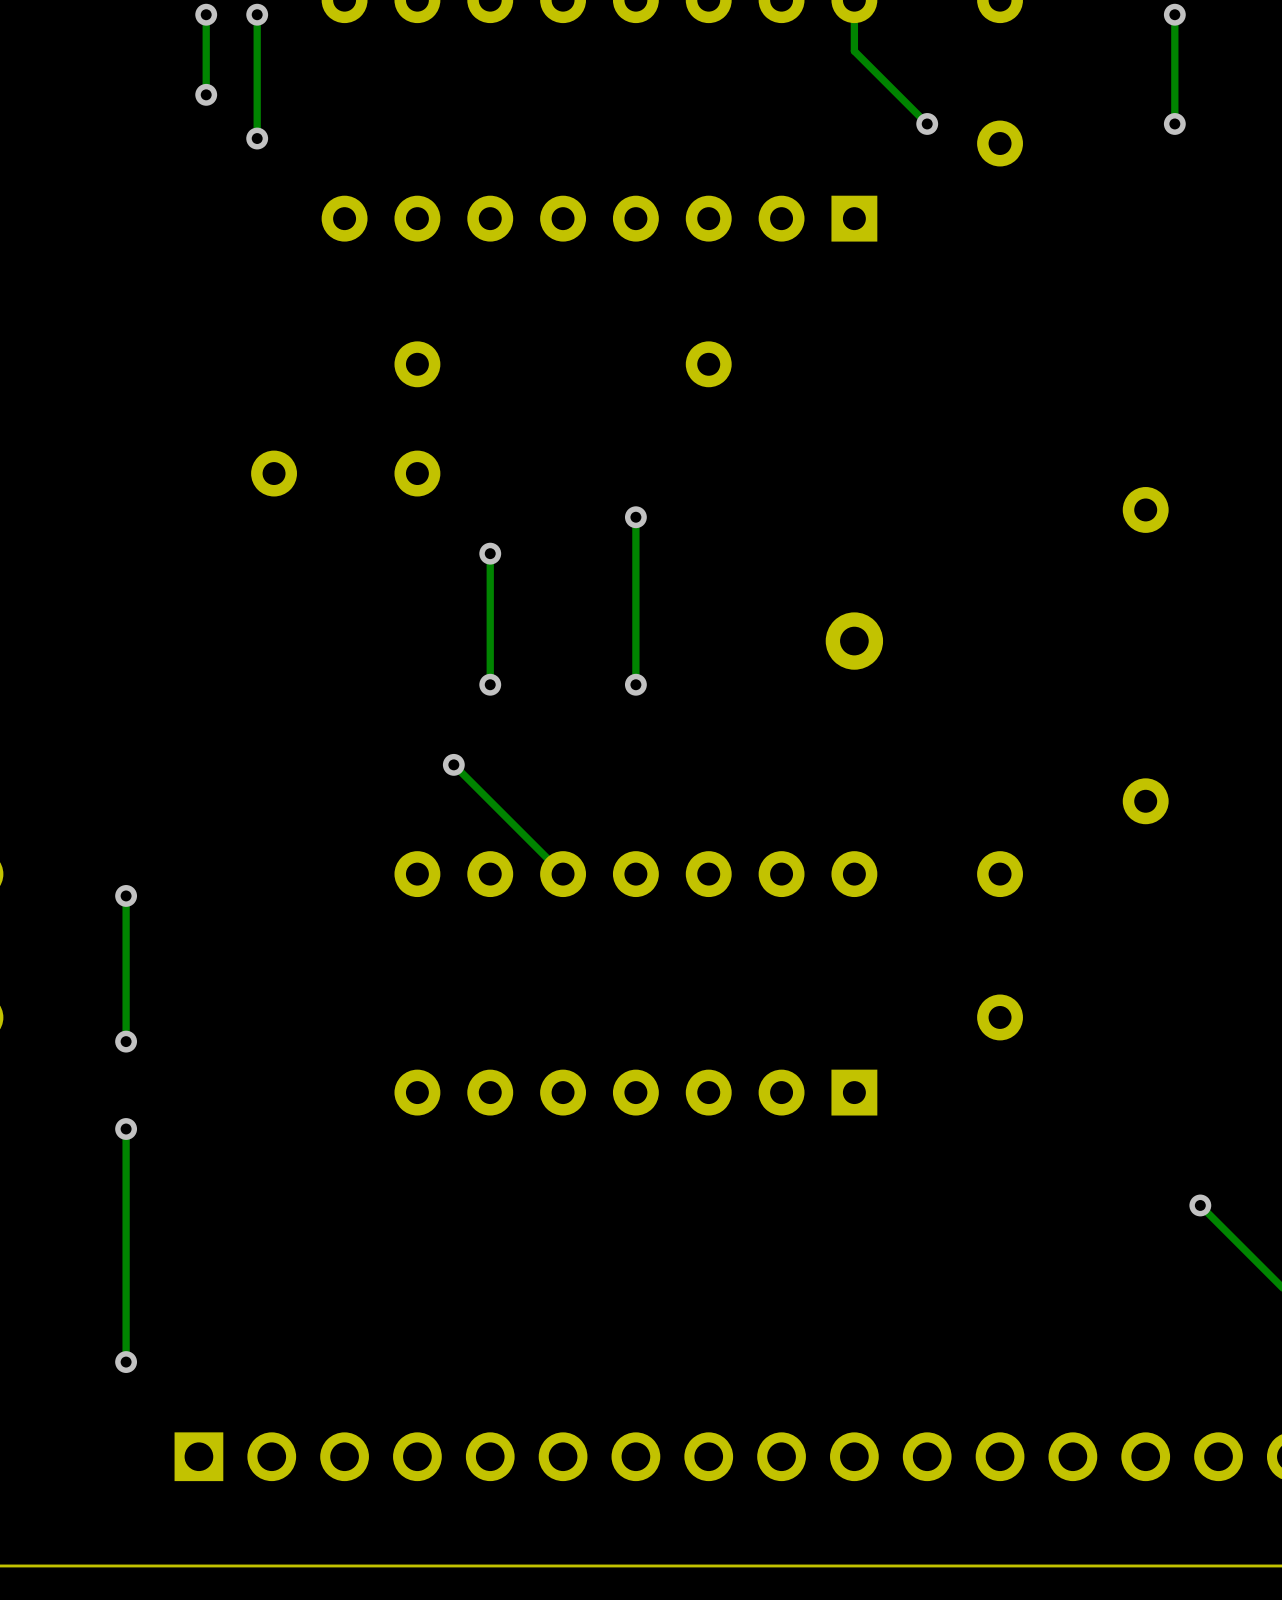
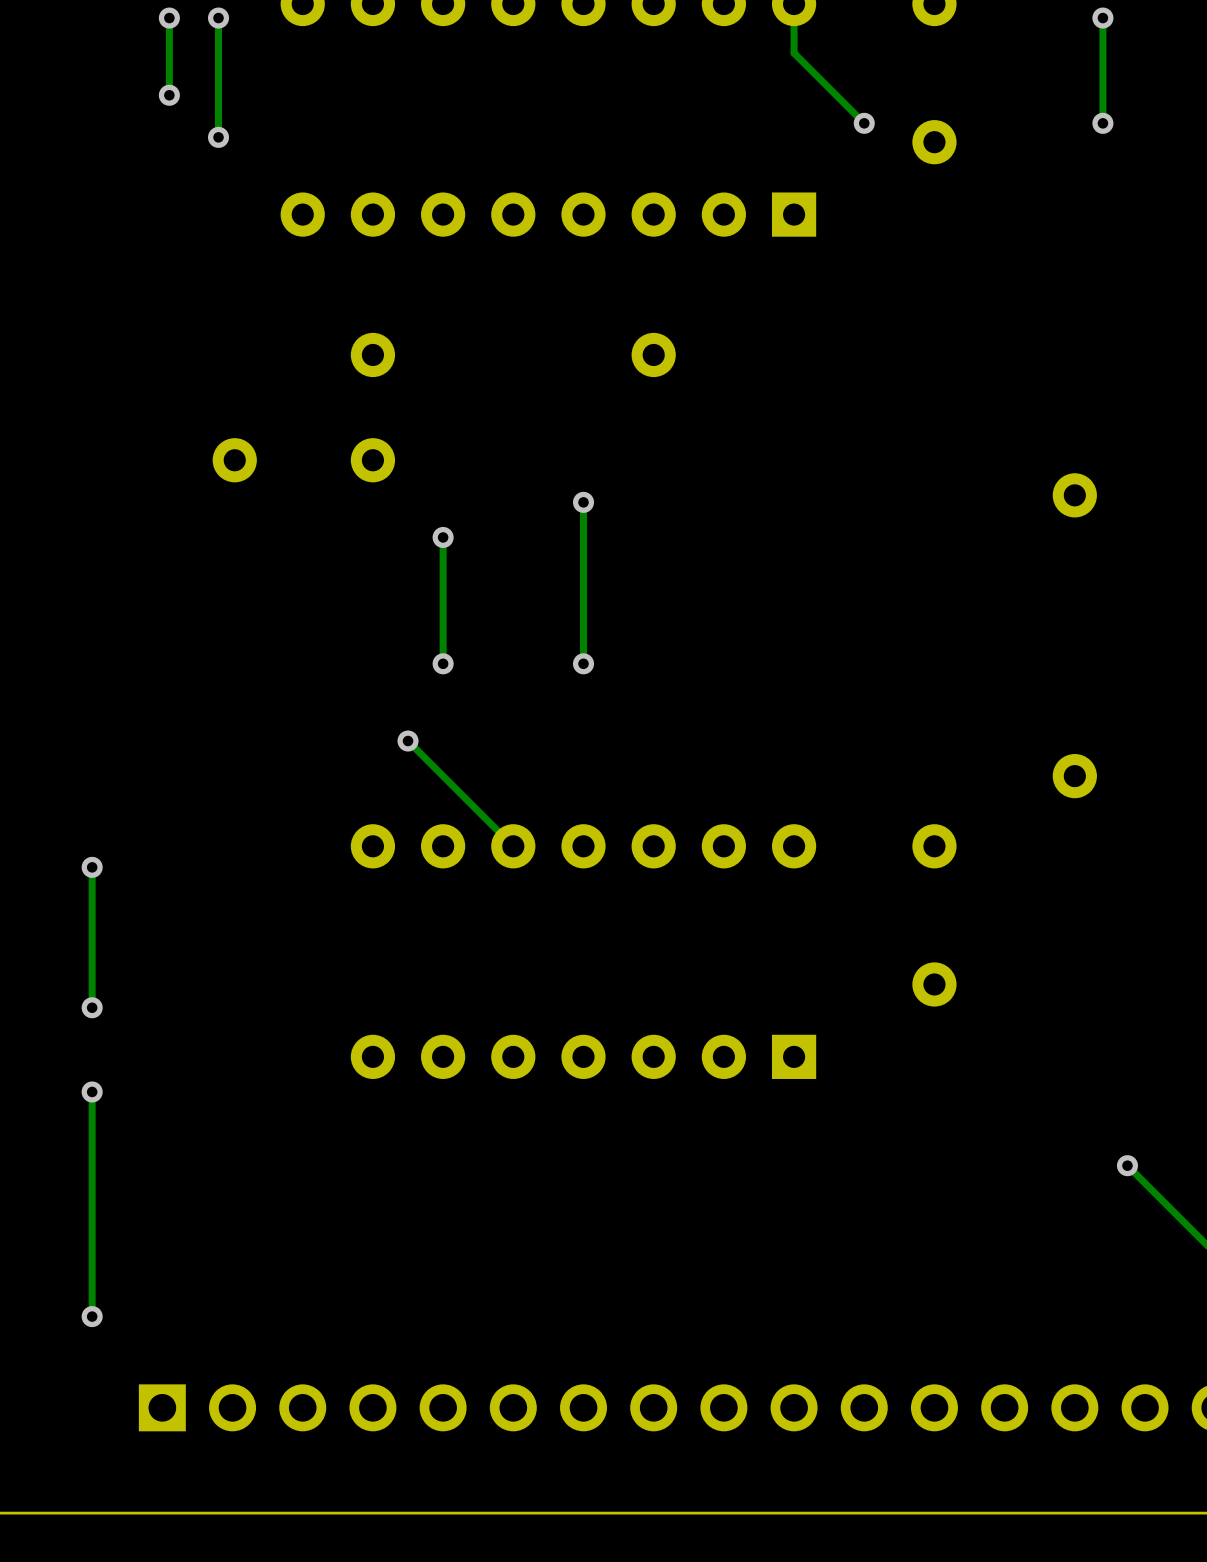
part: (854, 641) -> none

